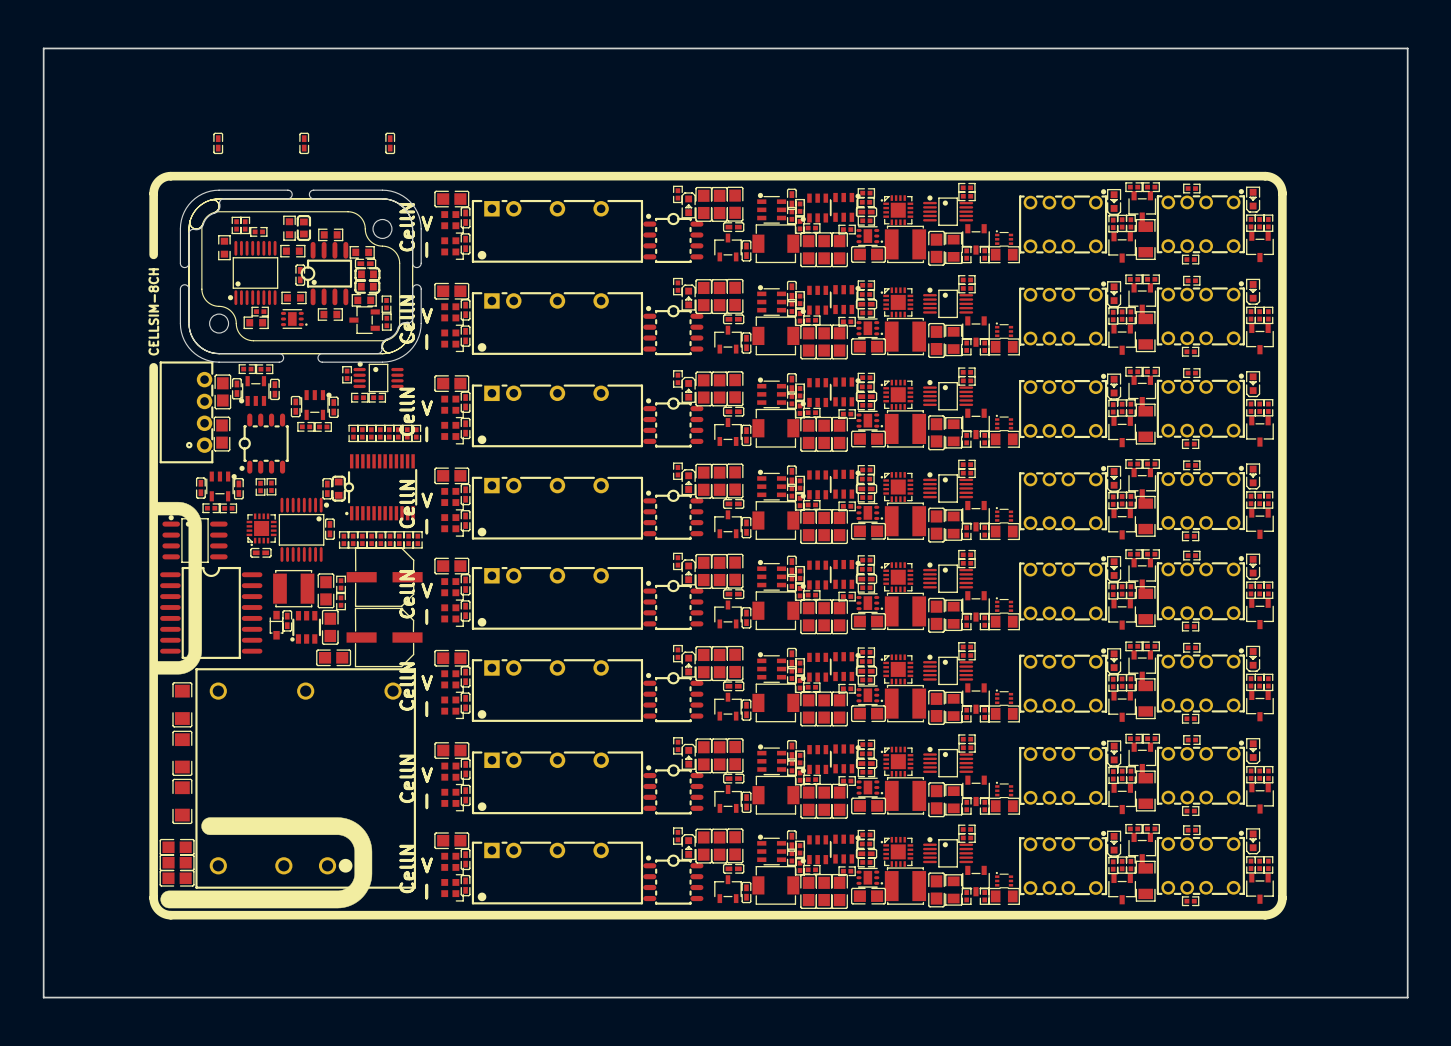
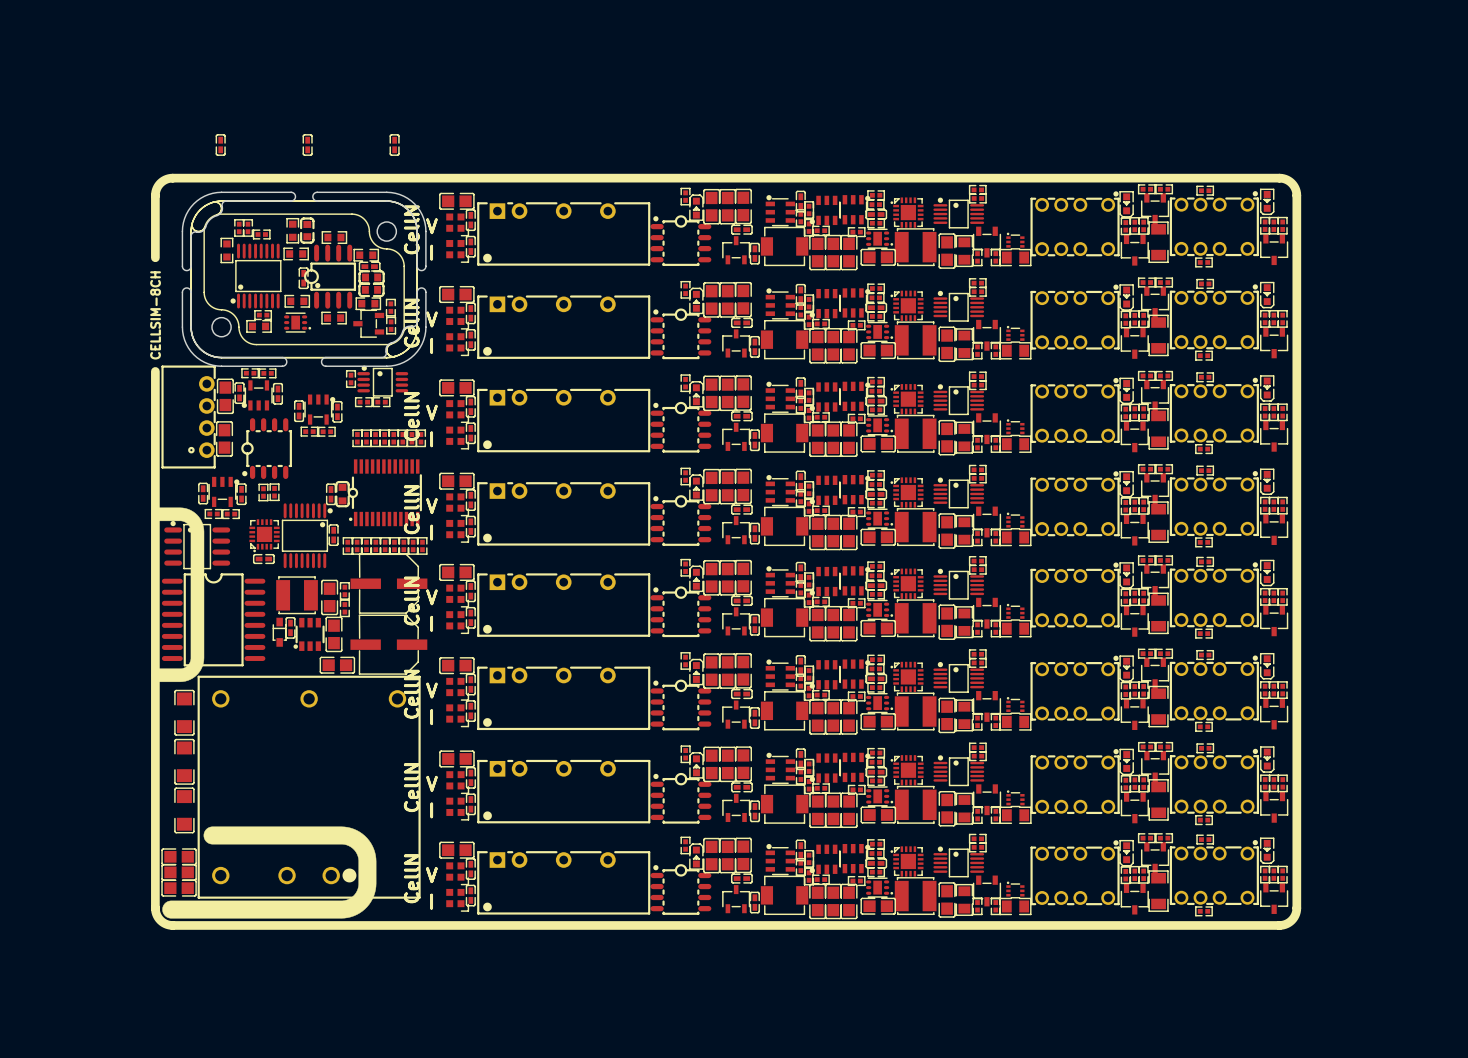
board edge: (43, 48) (1407, 48) (1407, 997) (43, 997) (43, 48) -> none

